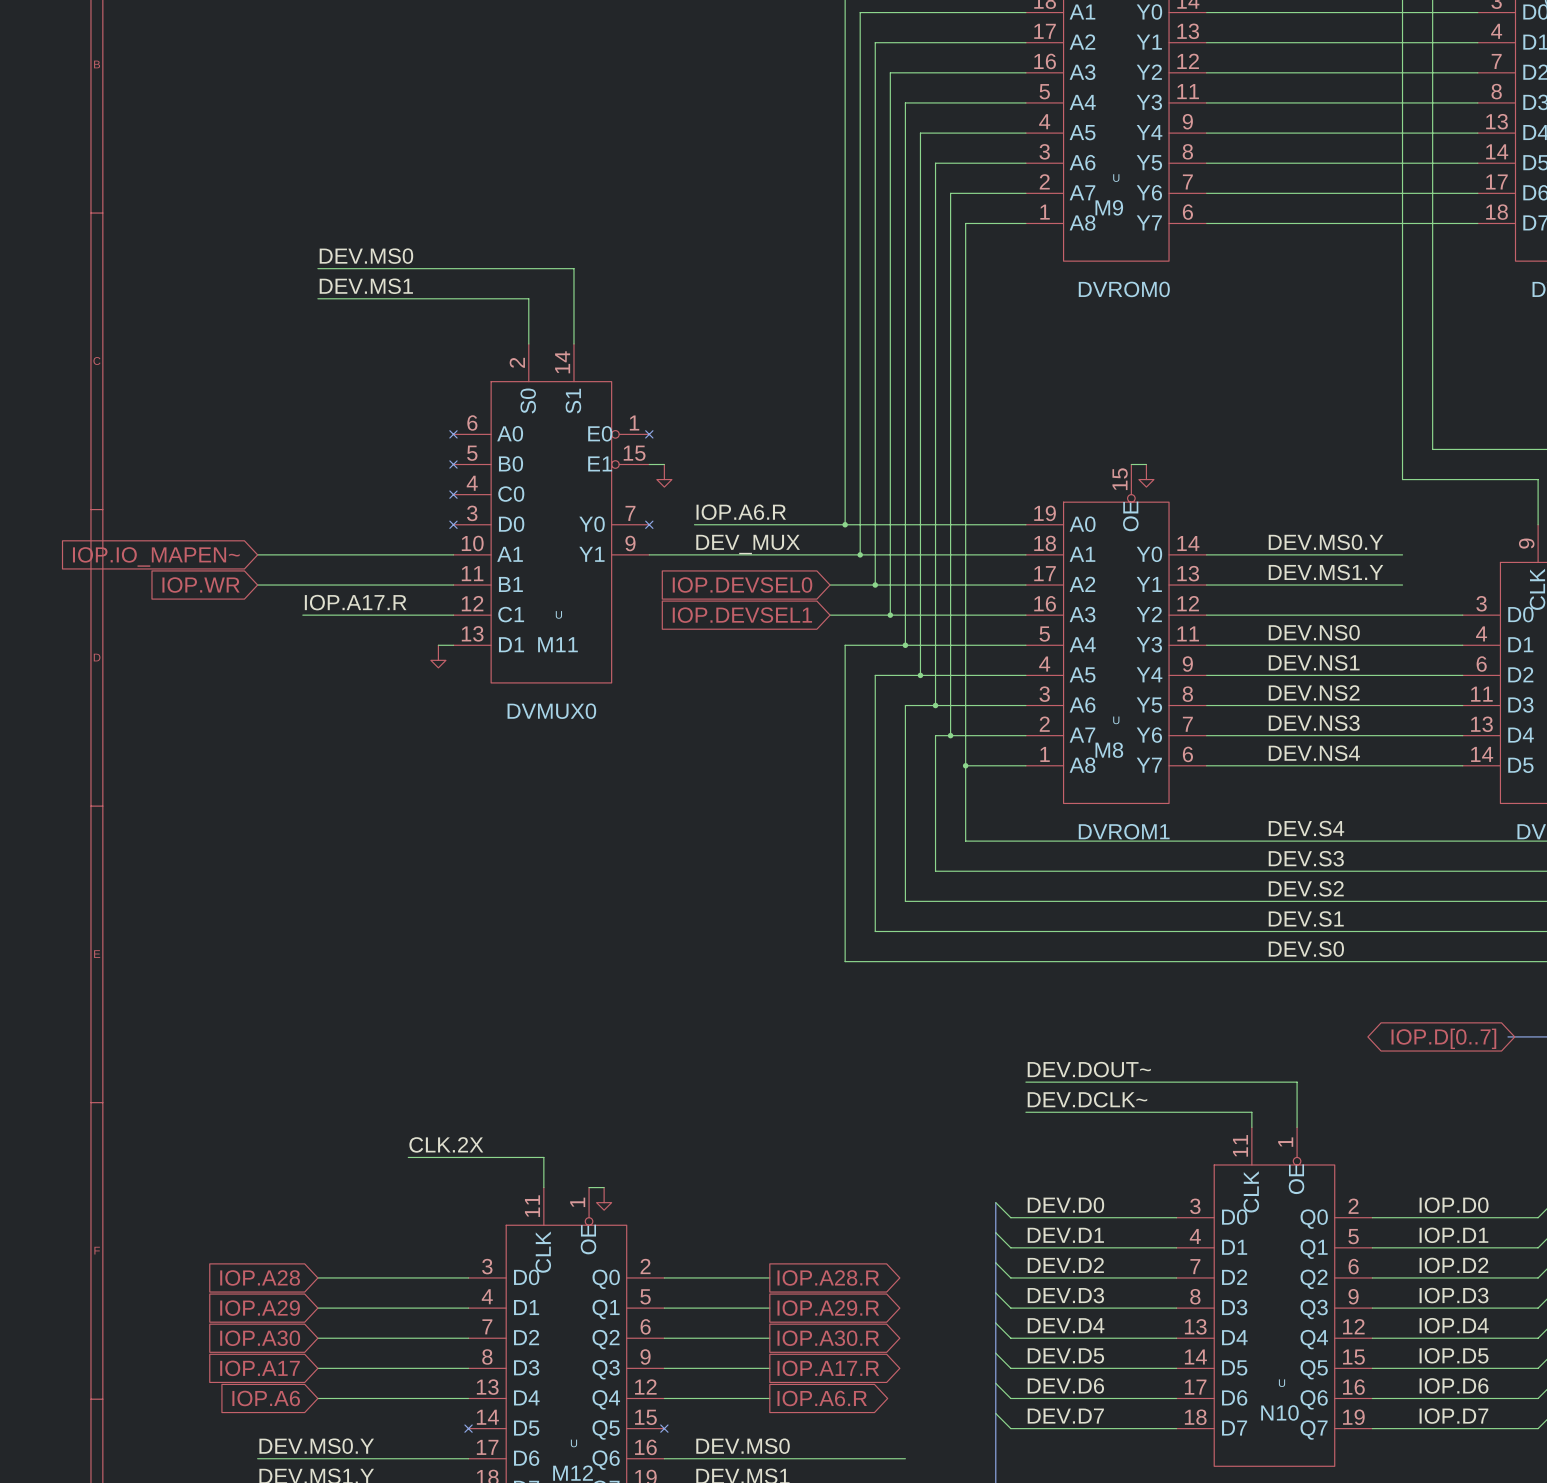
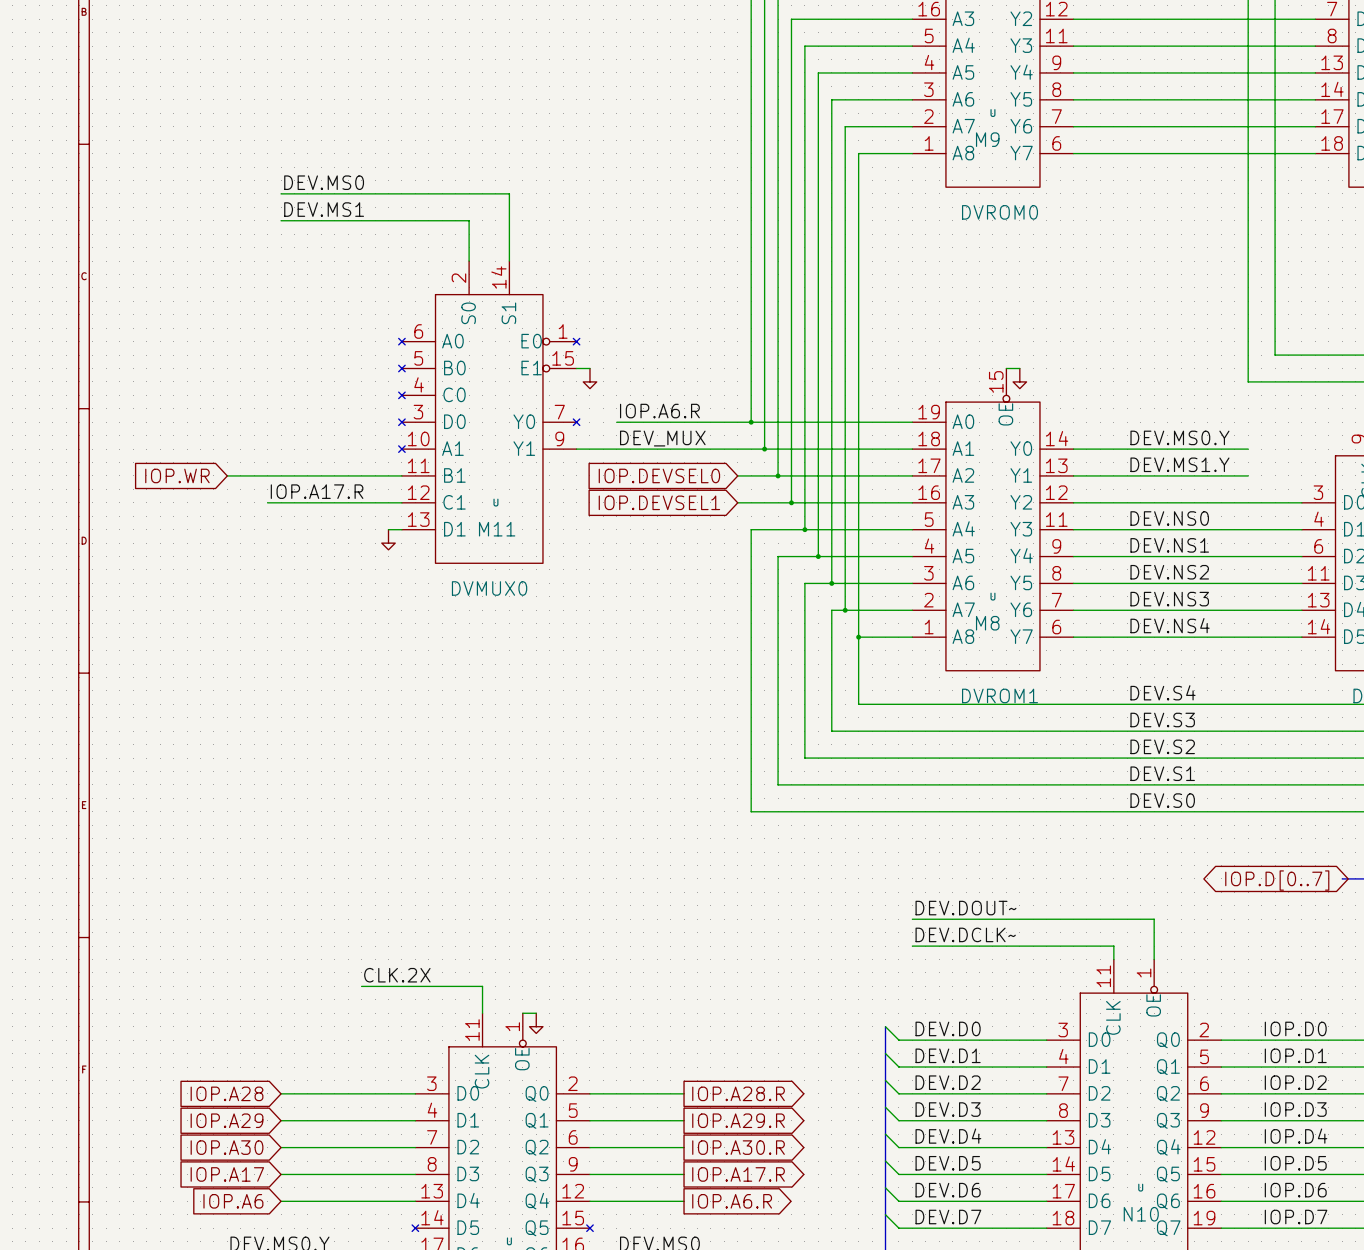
wire: (257, 554) (453, 554) -> none
no-connect mark: none -> (401, 449)
global label: IOP.IO_MAPEN~ (156, 556) -> none

